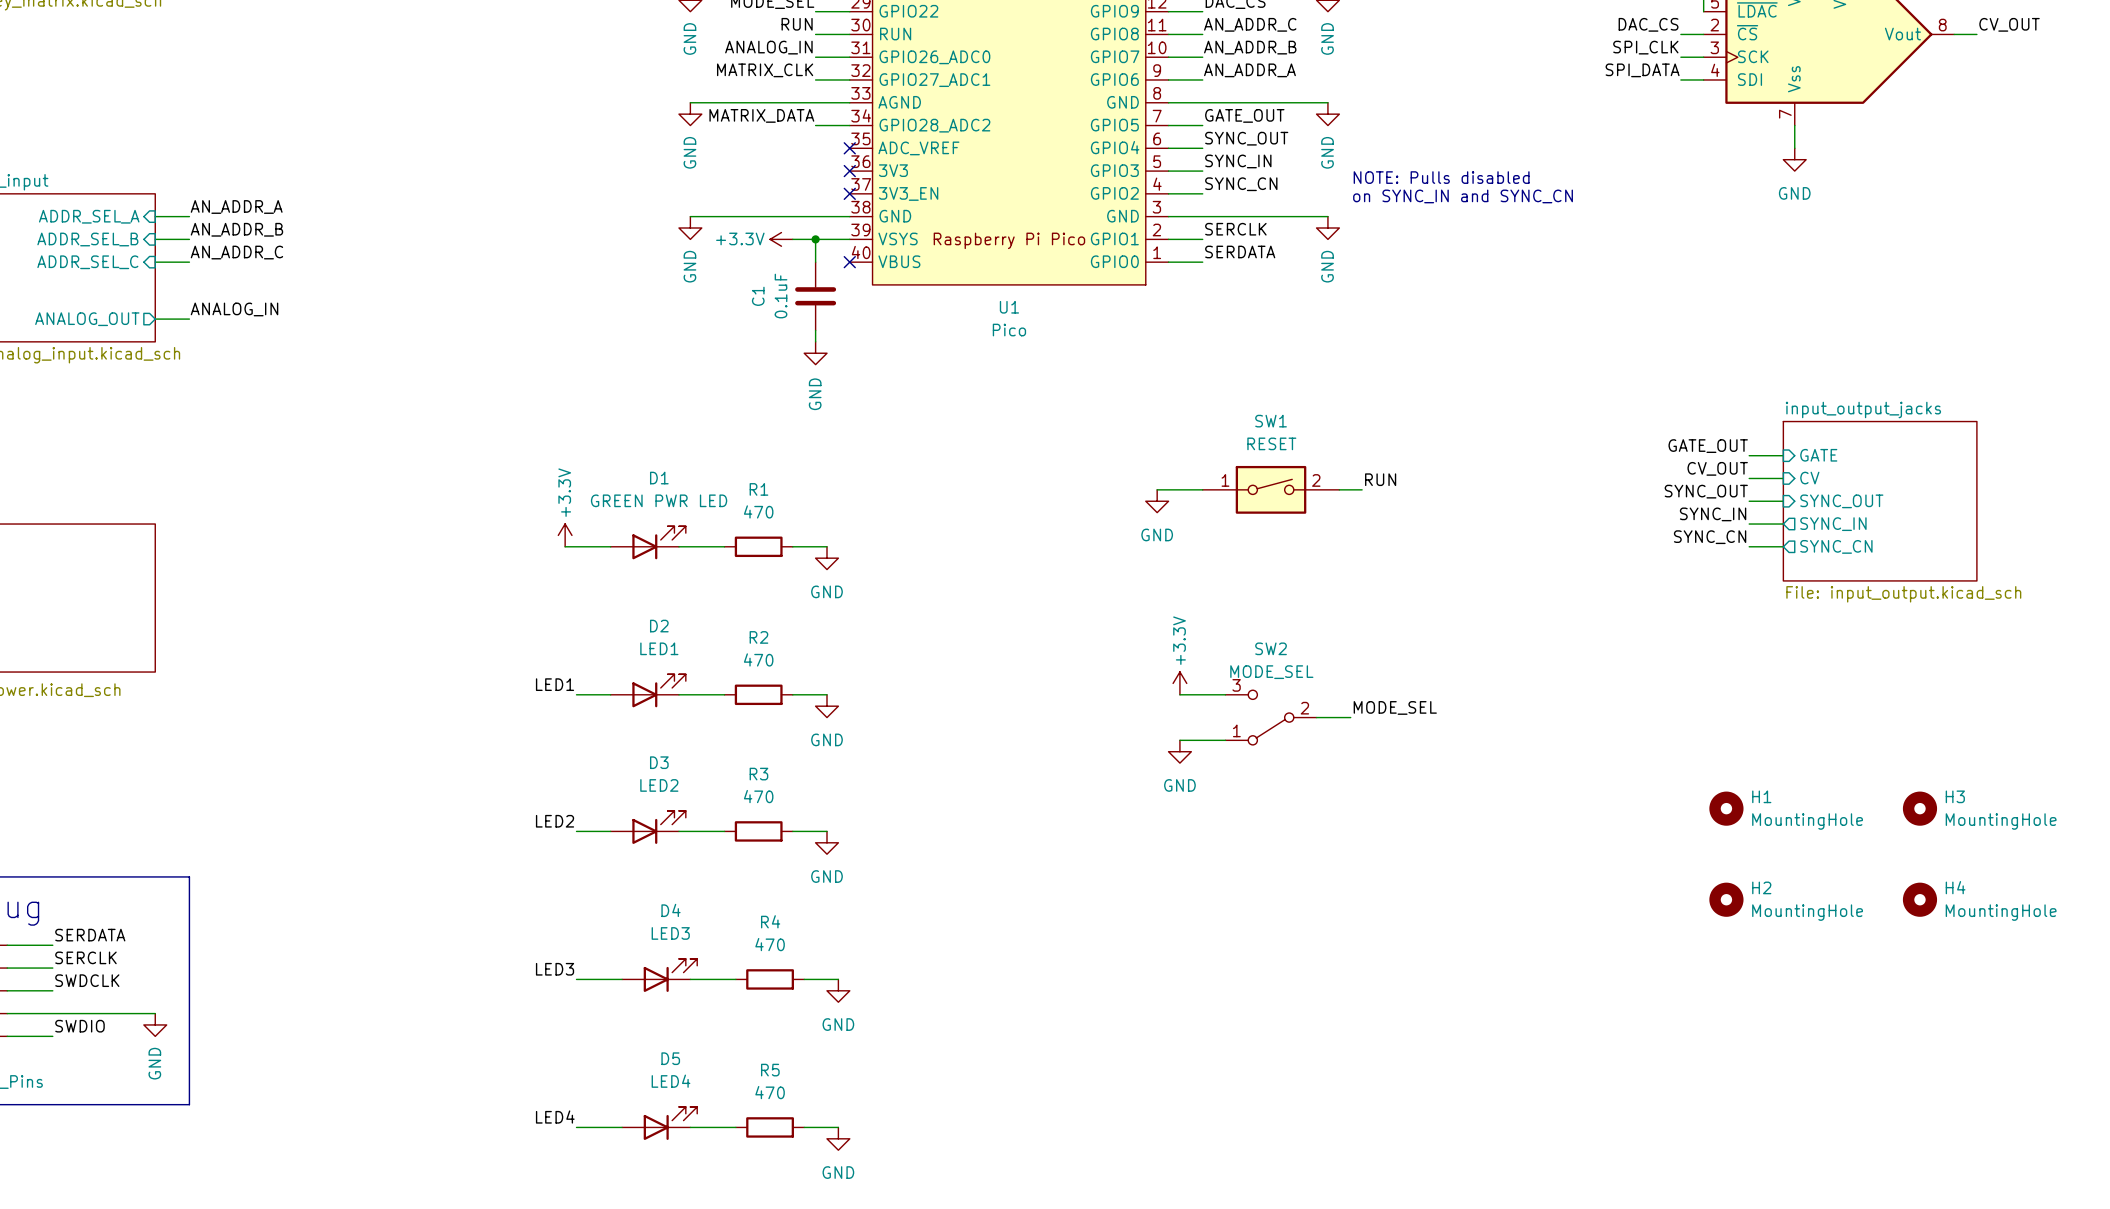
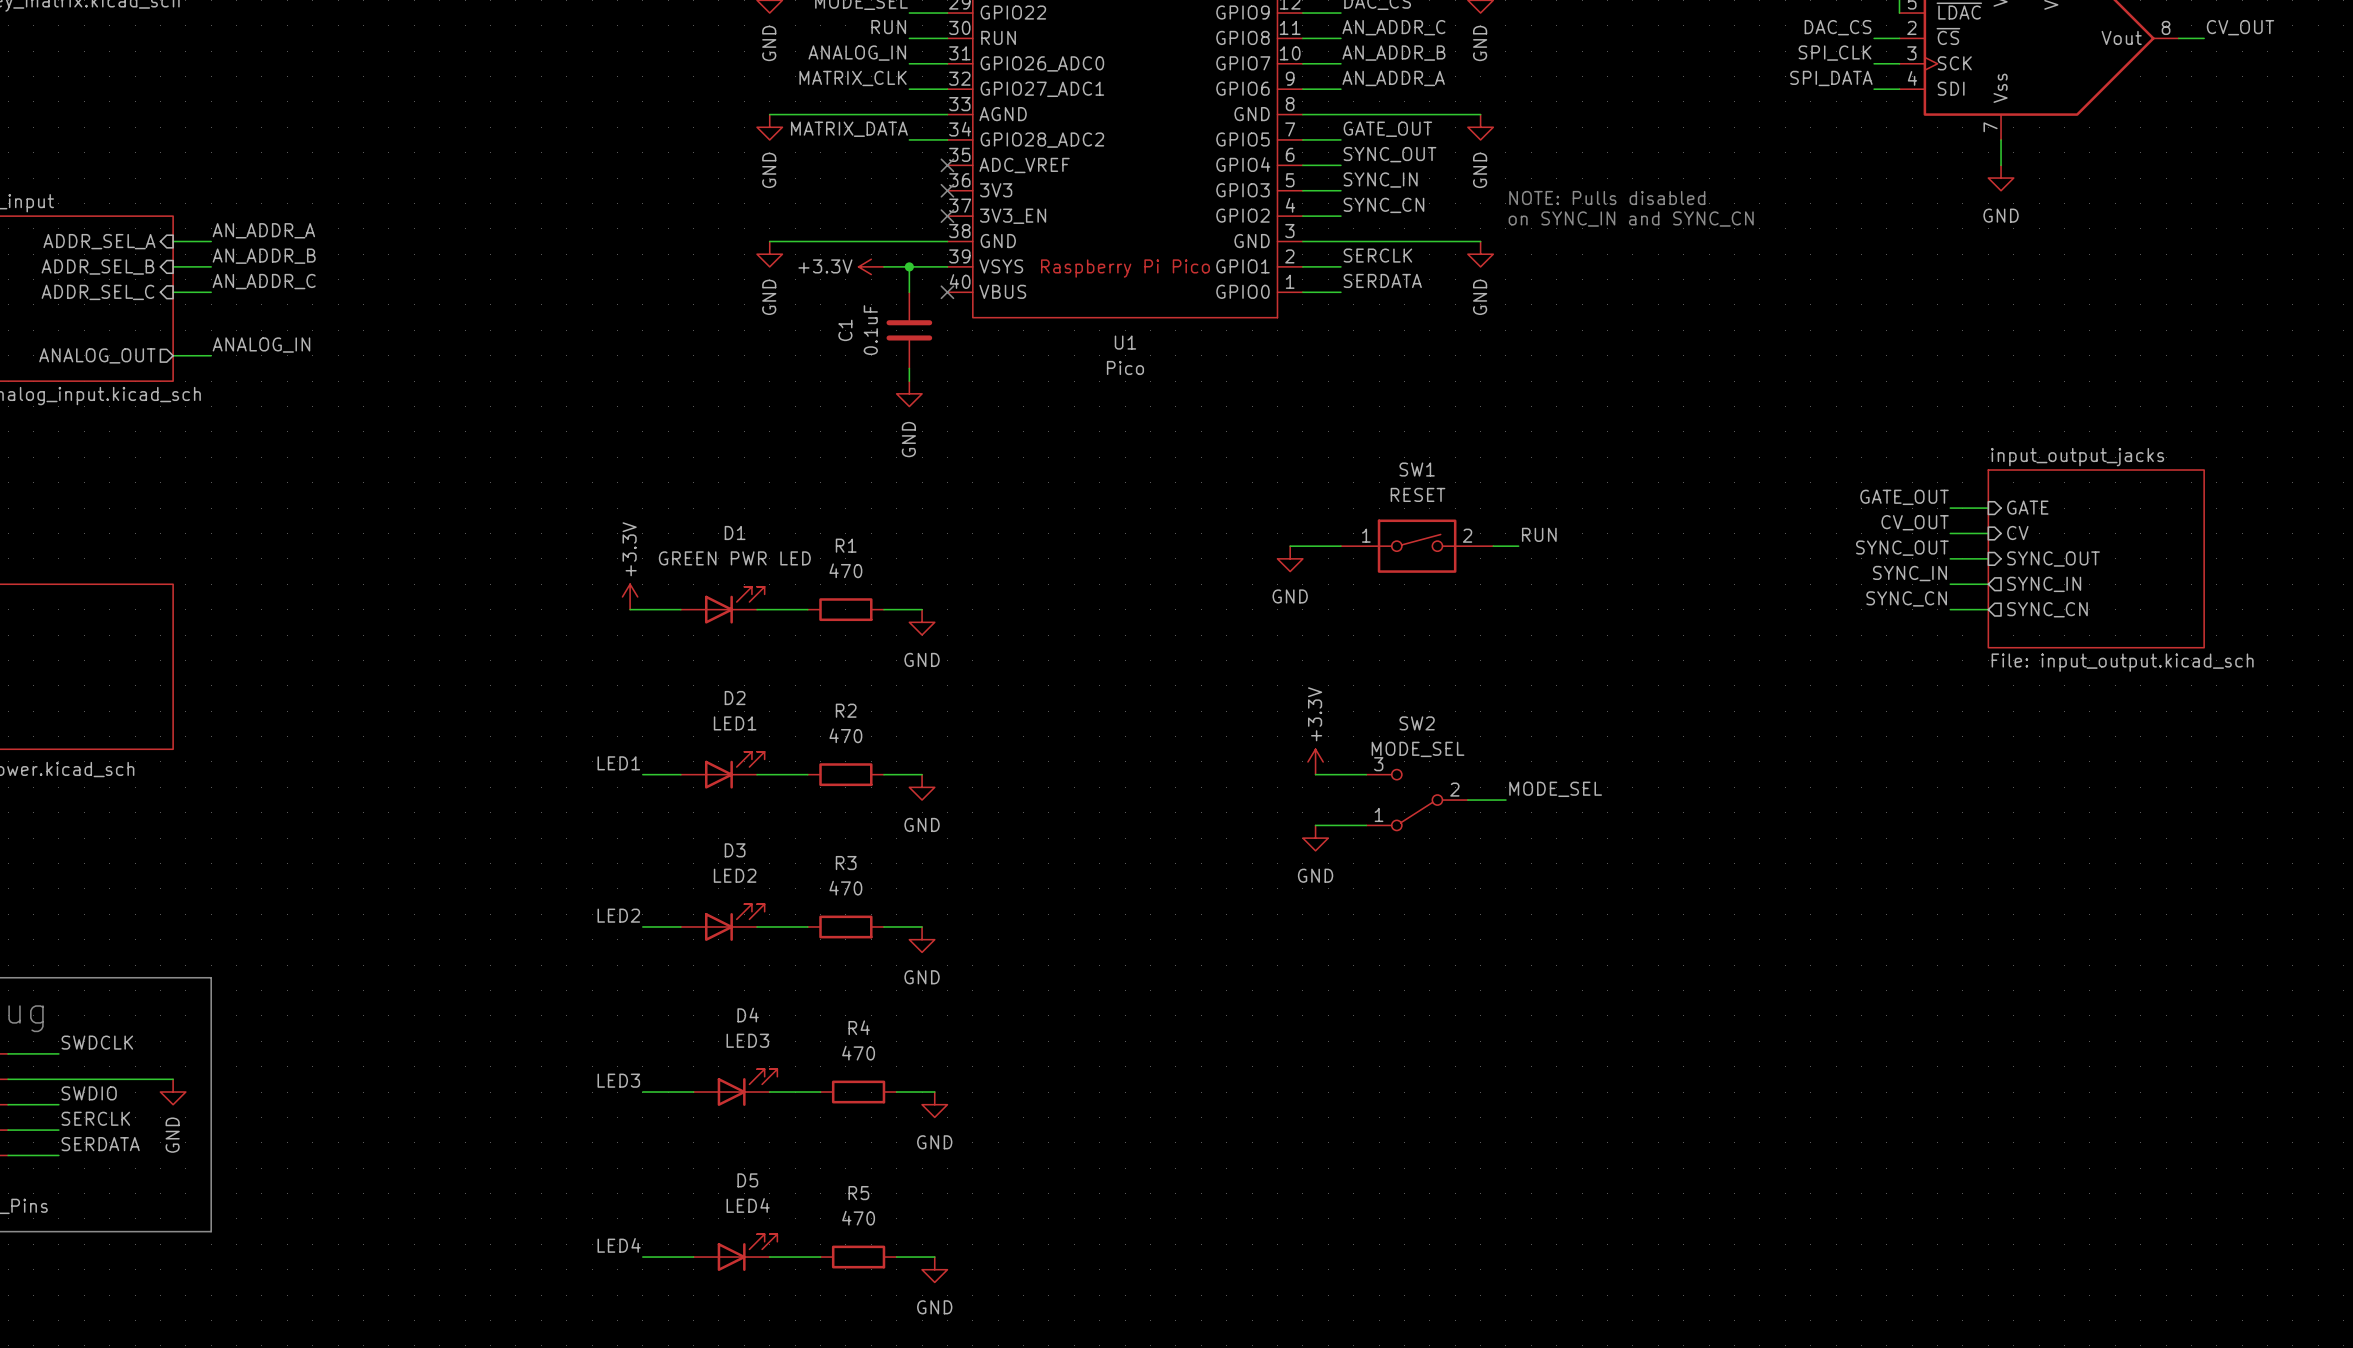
H1: MountingHole (1726, 808) -> none
H3: MountingHole (1919, 808) -> none
H2: MountingHole (1726, 899) -> none
H4: MountingHole (1919, 899) -> none
label: SERDATA (90, 935) -> SWDCLK (97, 1042)
label position: SERCLK (85, 957) -> SERCLK (95, 1118)
label: SWDCLK (87, 980) -> SWDIO (89, 1093)
wire: (52, 1013) (155, 1013) -> (58, 1079) (173, 1079)
power symbol position: GND (155, 1024) -> GND (173, 1092)
label: SWDIO (79, 1026) -> SERDATA (100, 1144)

